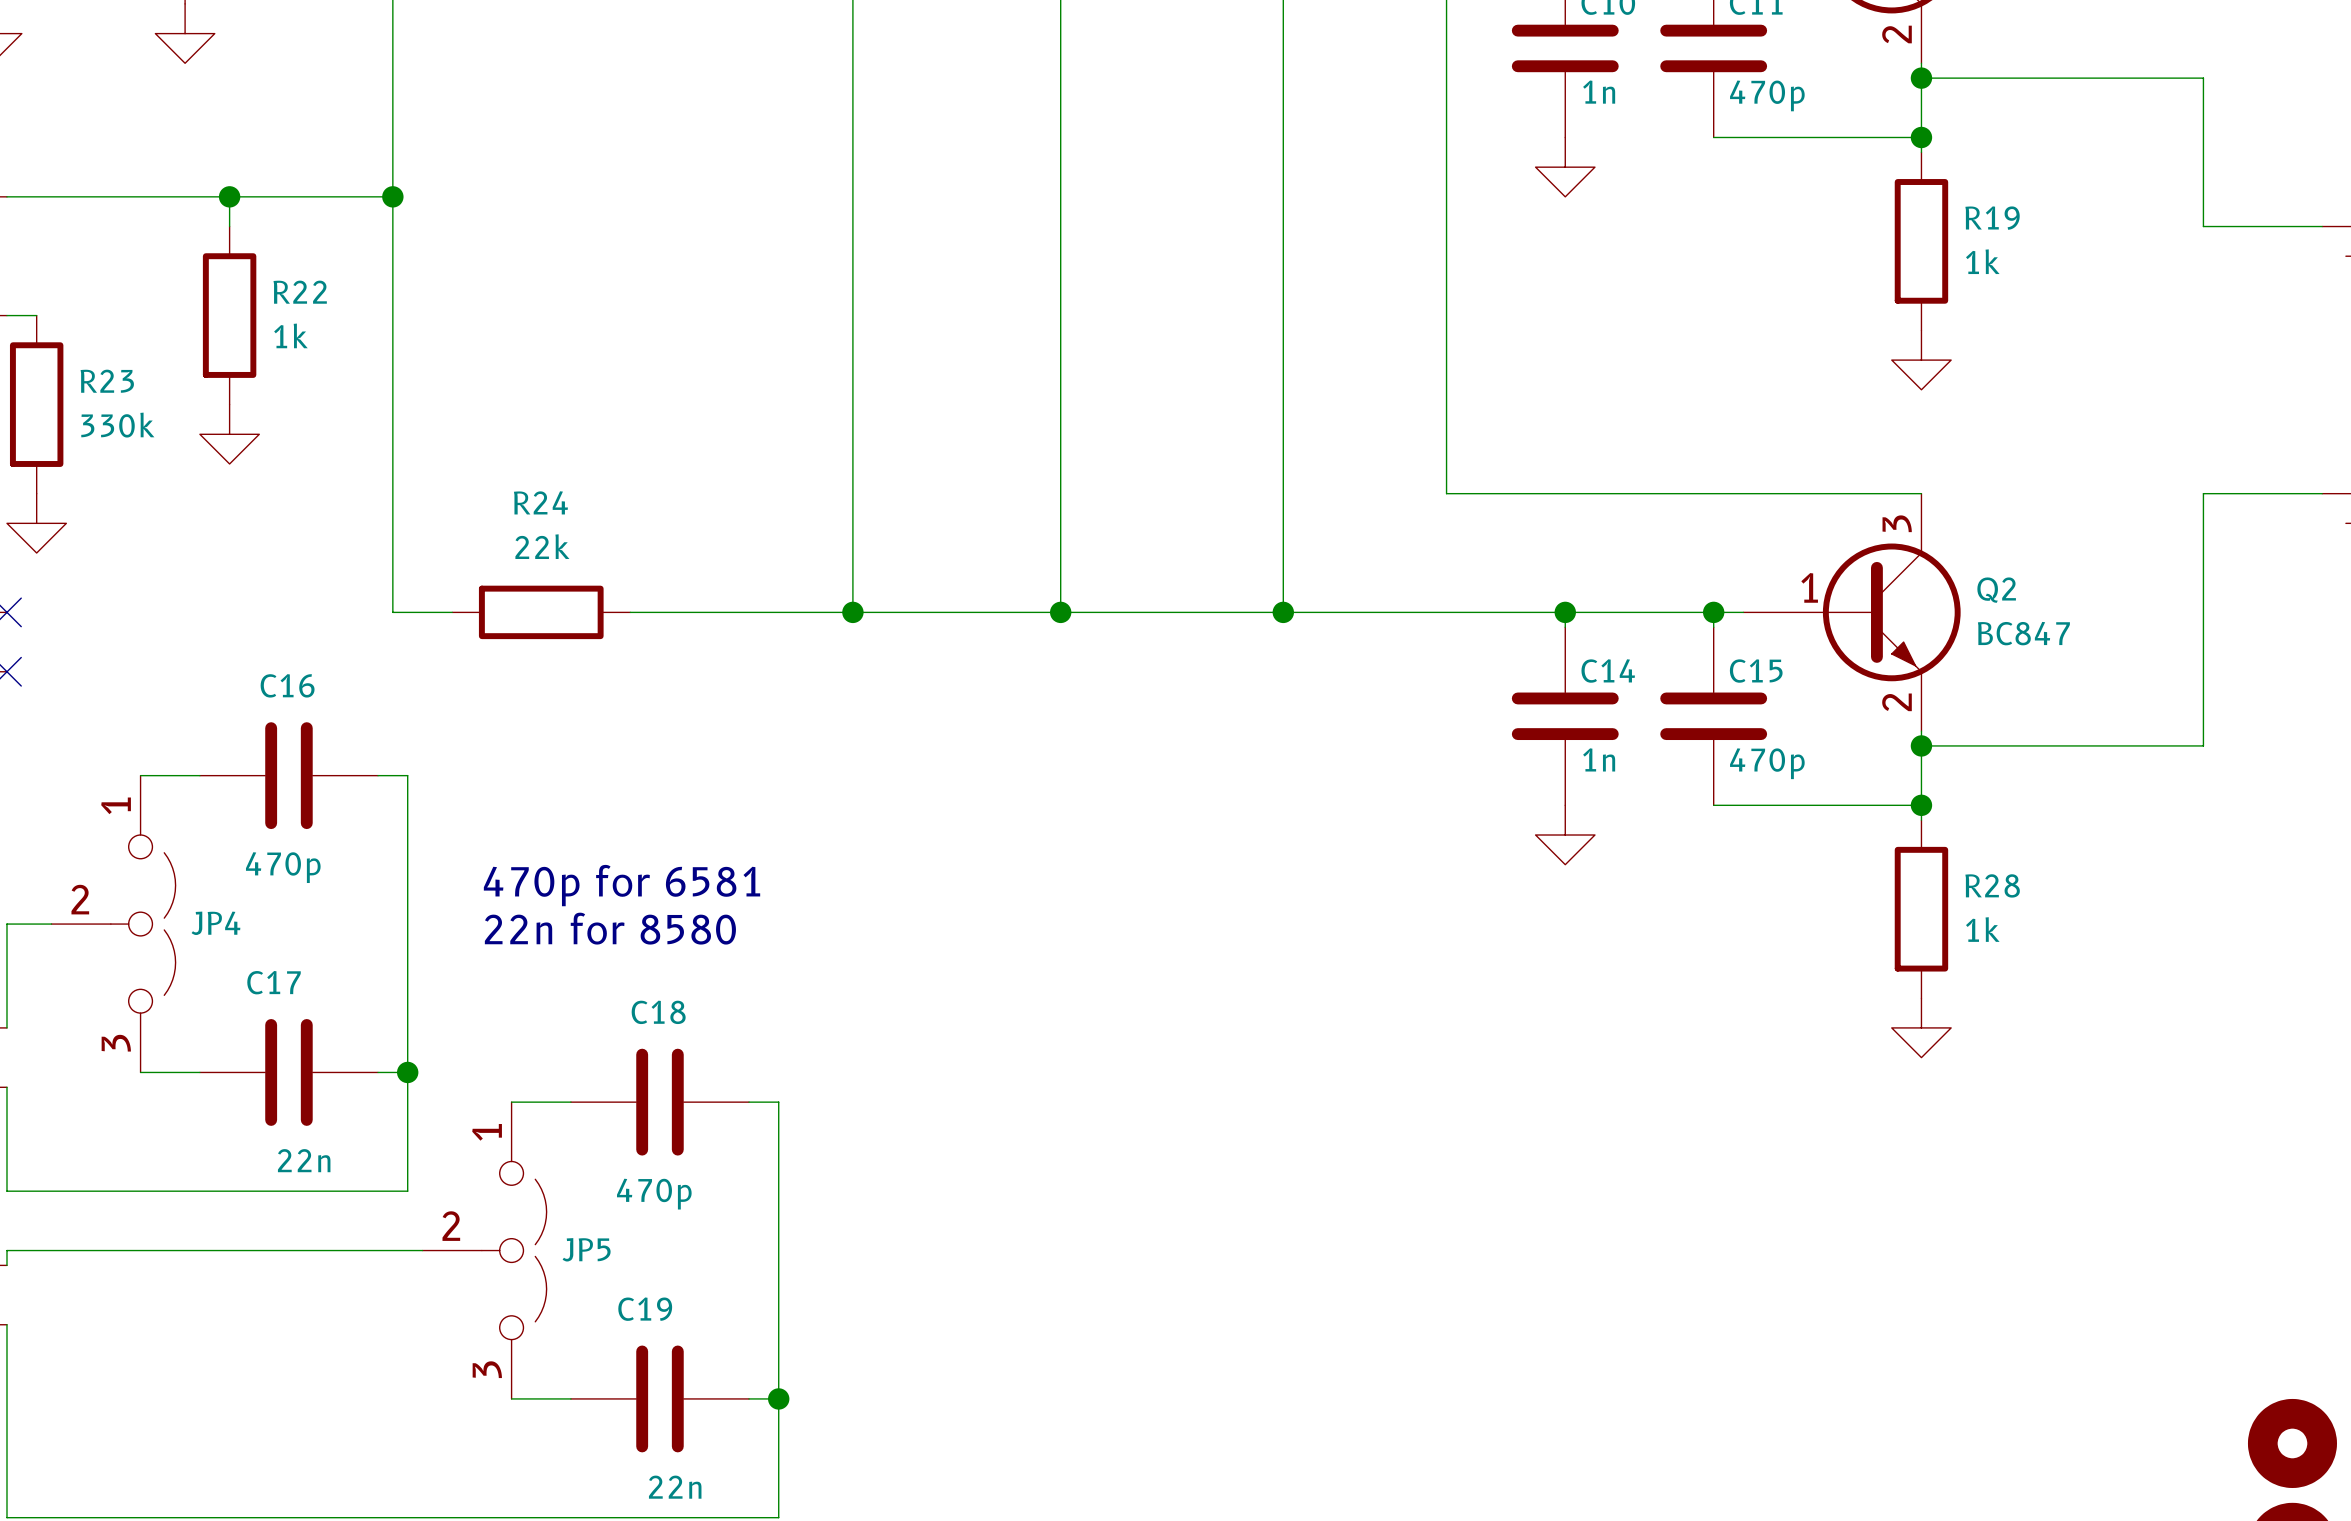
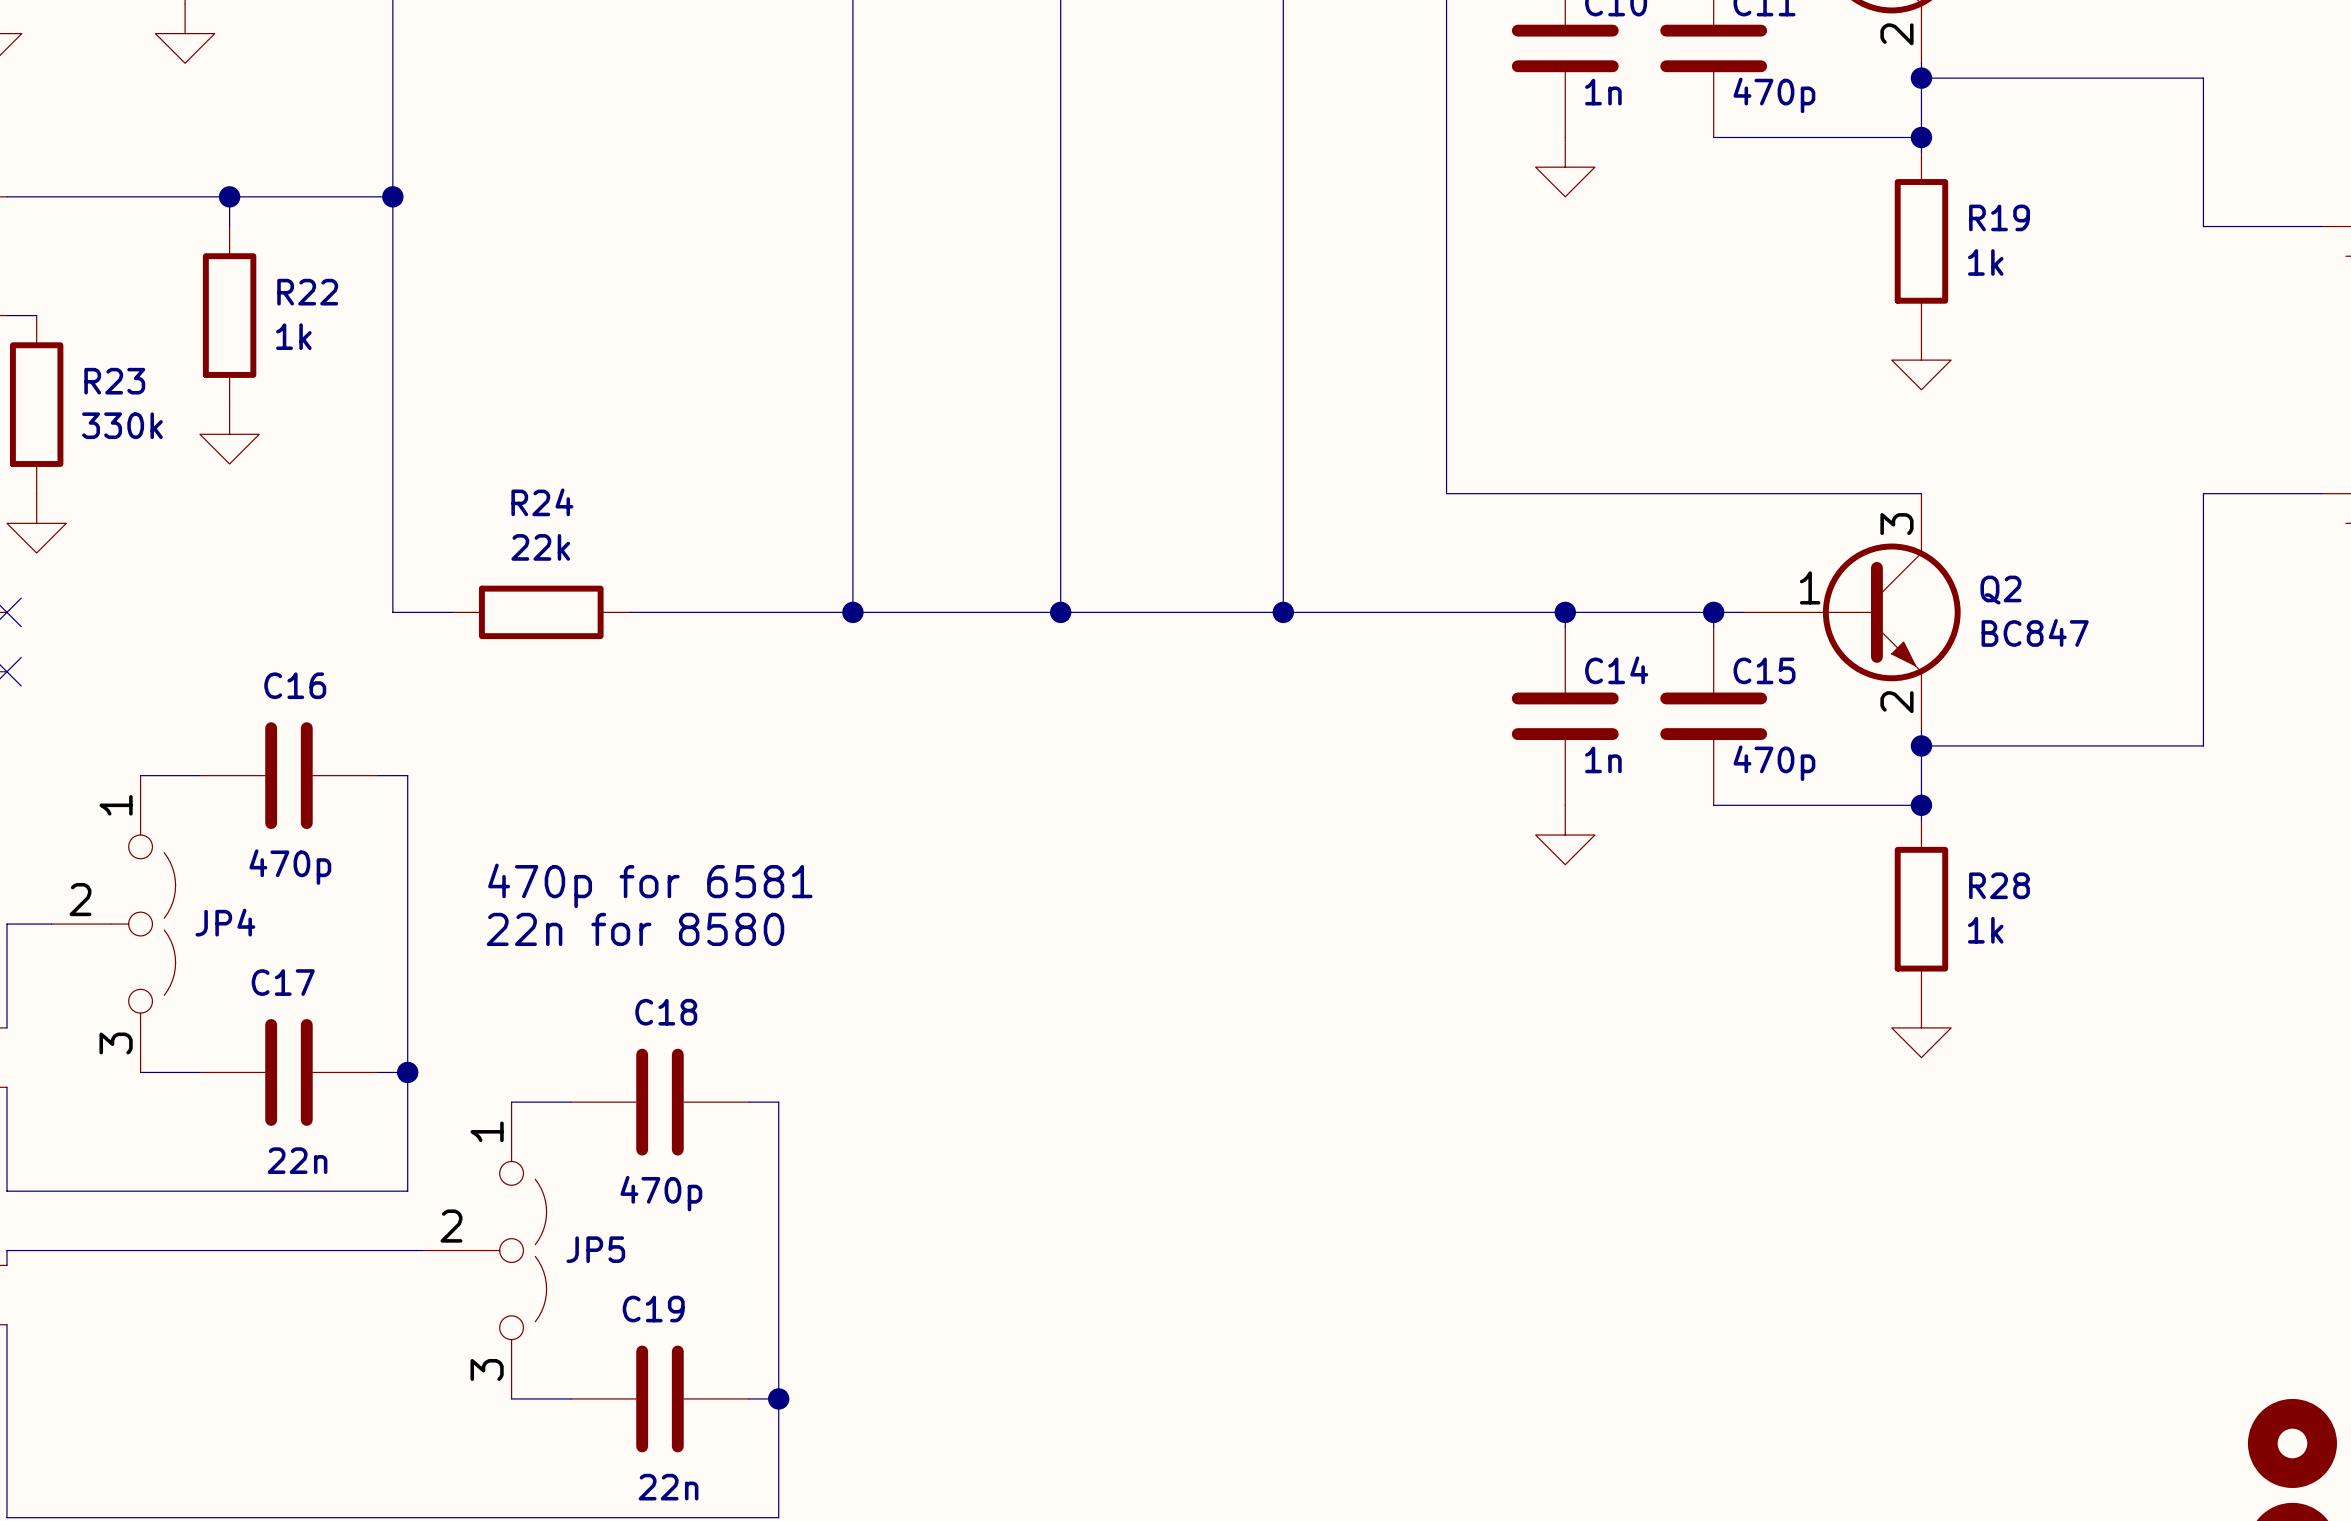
C17 name position: C17 (274, 982) -> C17 (283, 982)
C19 name position: C19 (645, 1309) -> C19 (653, 1309)

